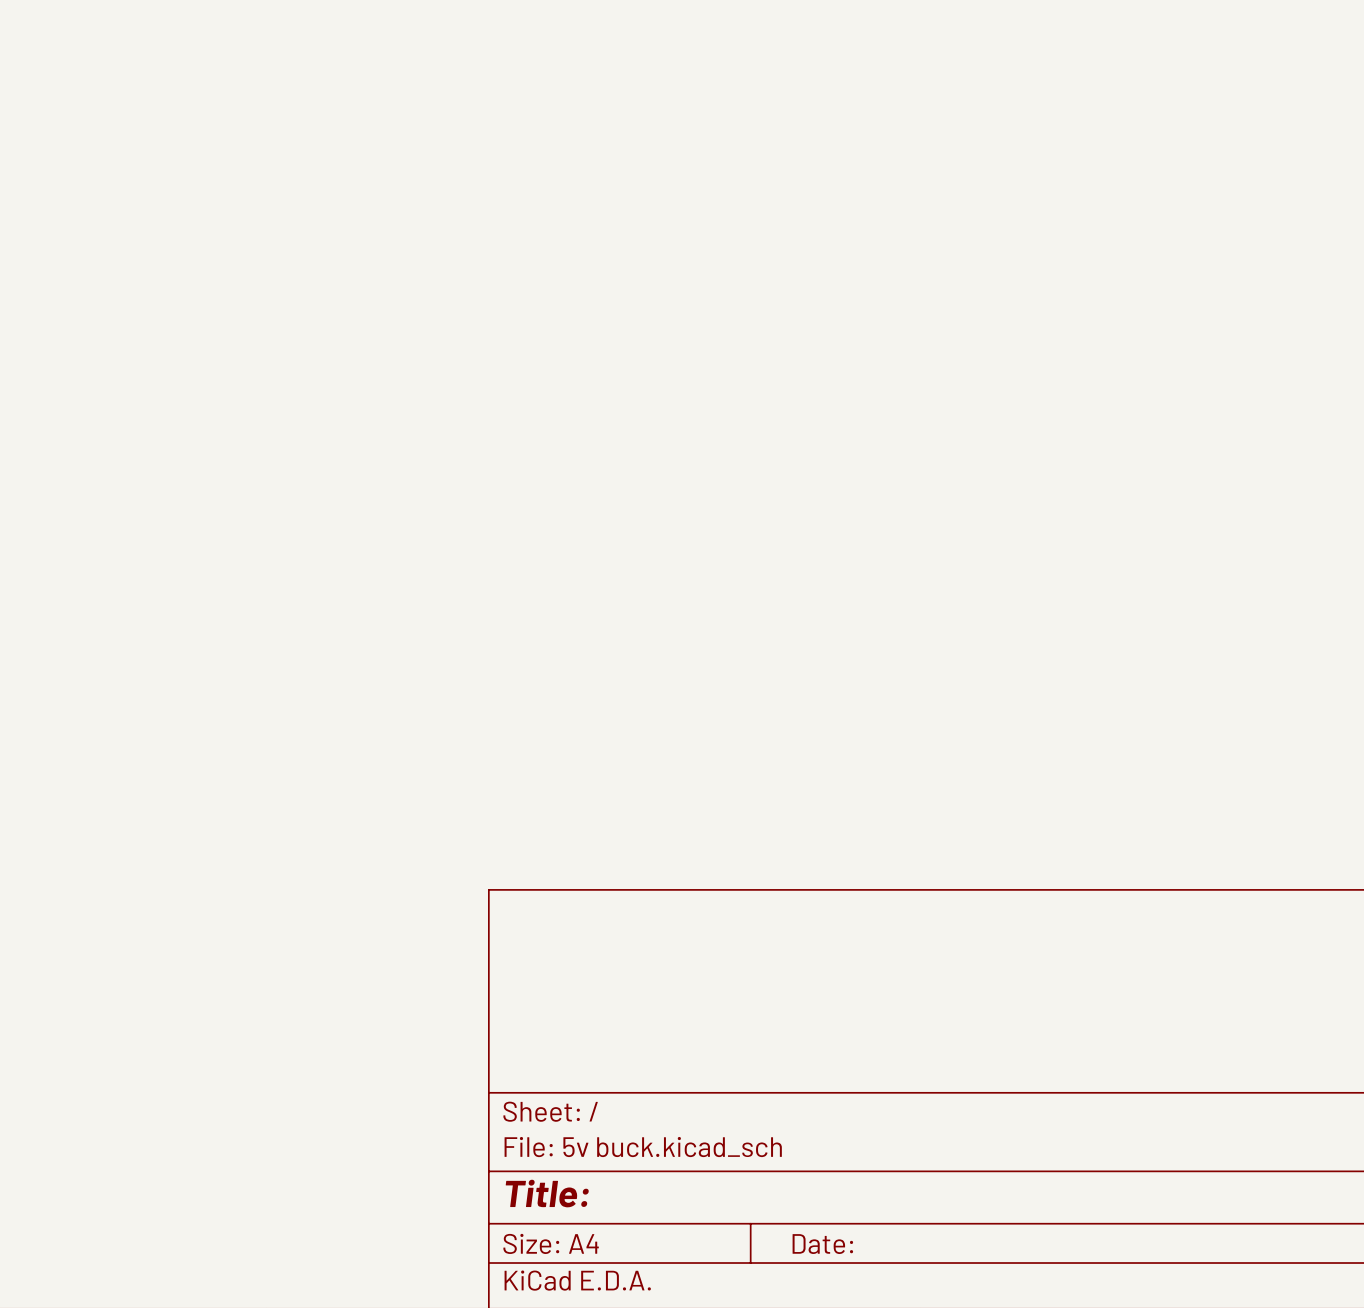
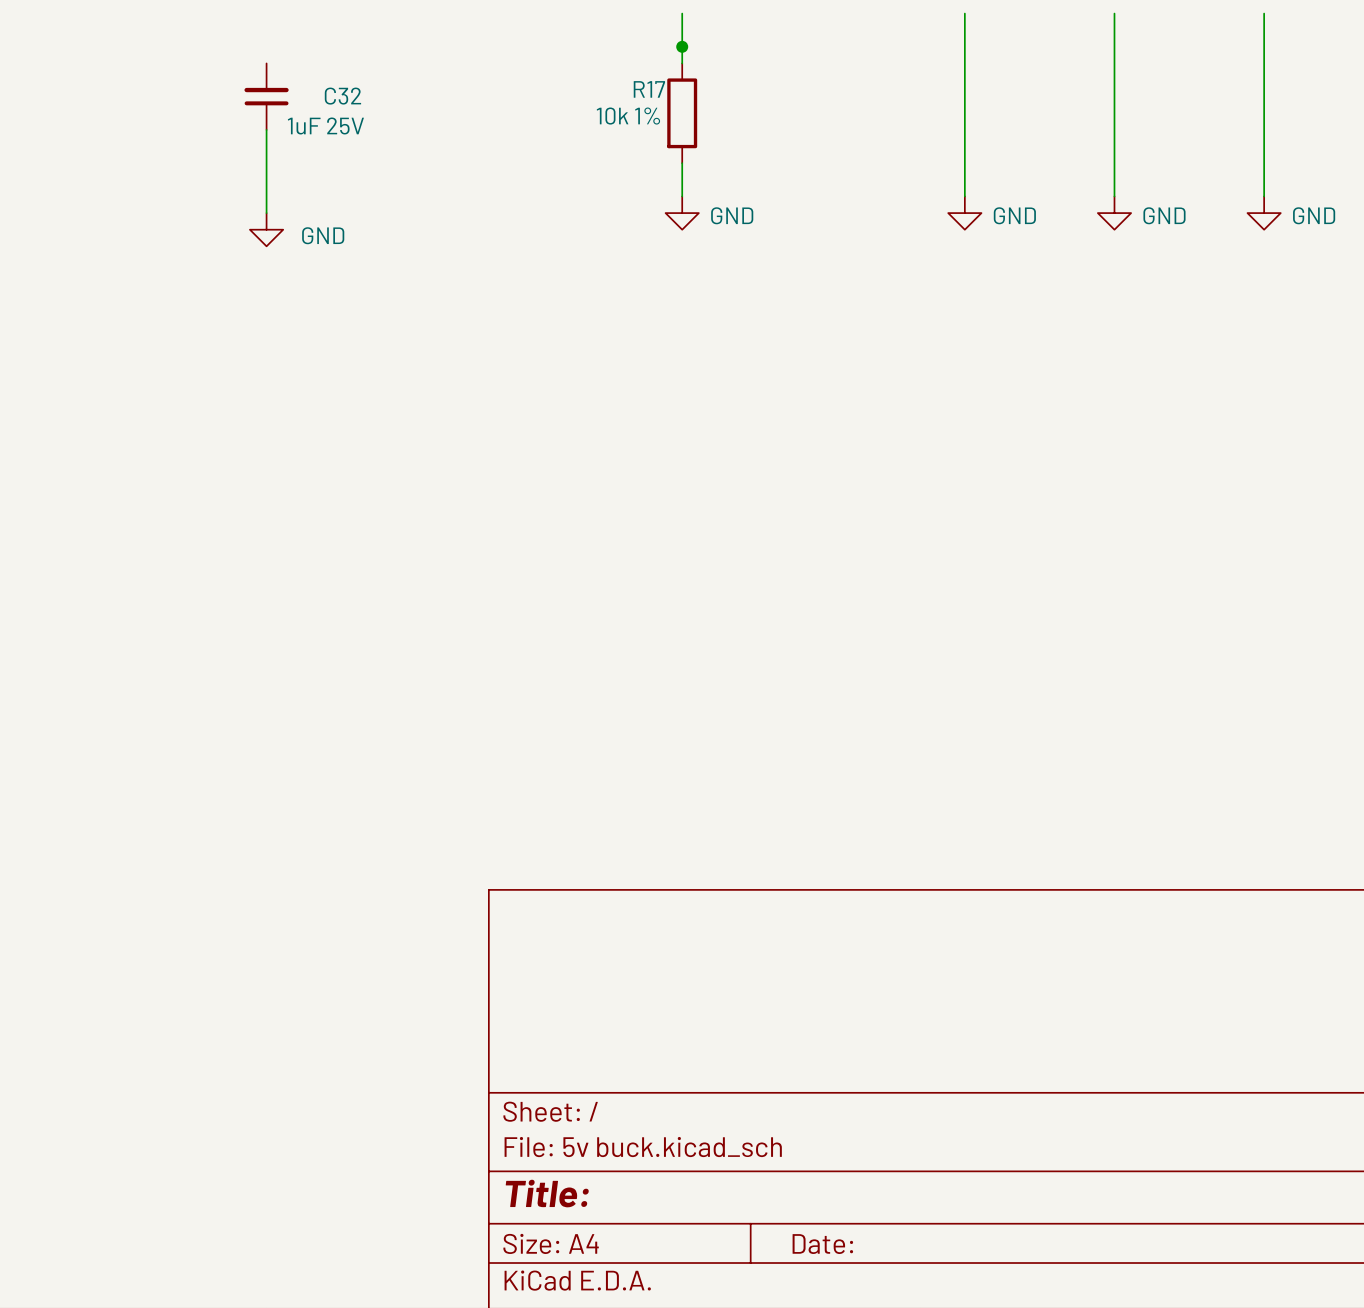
wire: none -> (682, 13) (682, 63)
wire: none -> (964, 13) (964, 196)
wire: none -> (1114, 13) (1114, 196)
wire: none -> (1264, 13) (1264, 196)
junction: none -> (682, 46)
C32: none -> 1uF 25V (266, 96)
R17: none -> 10k 1% (682, 113)
wire: none -> (266, 129) (266, 213)
wire: none -> (682, 163) (682, 196)
power symbol: none -> GND (682, 213)
power symbol: none -> GND (964, 213)
power symbol: none -> GND (1114, 213)
power symbol: none -> GND (1264, 213)
power symbol: none -> GND (266, 229)

